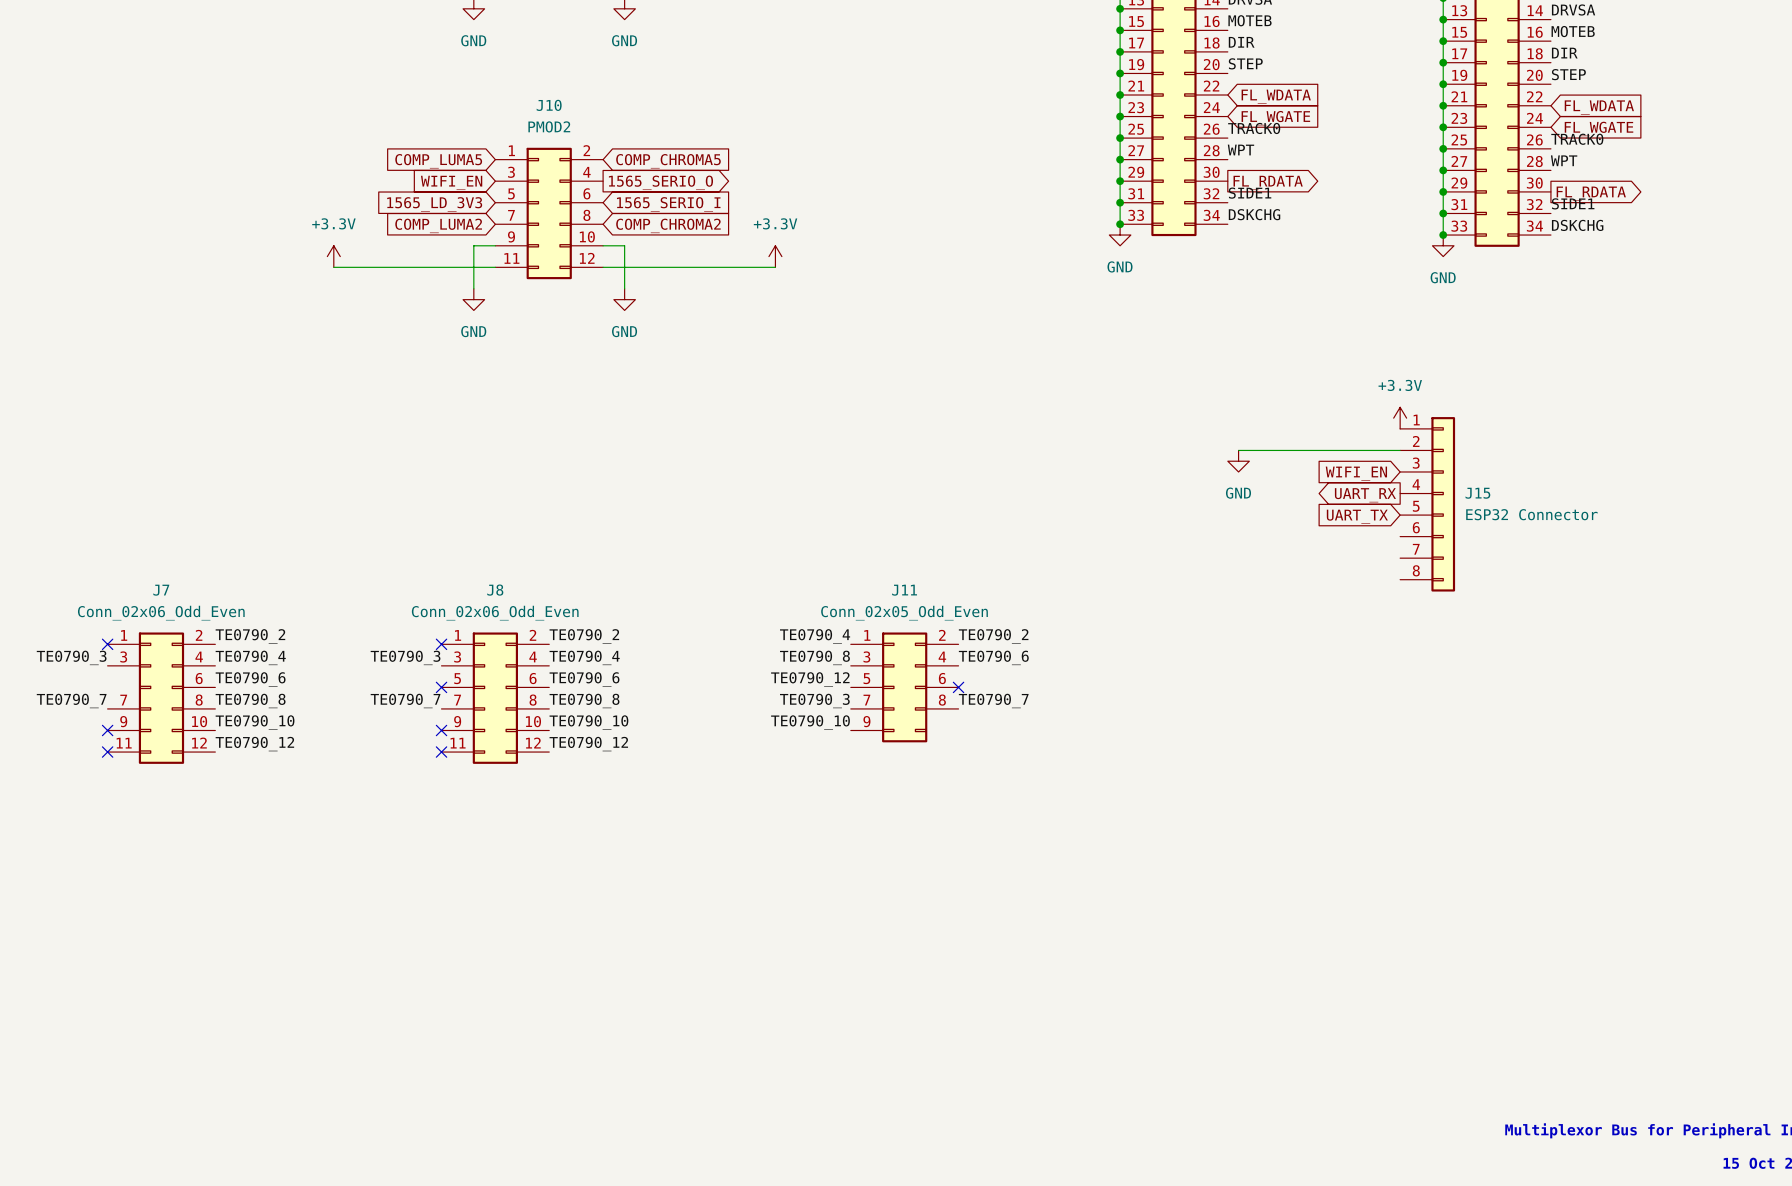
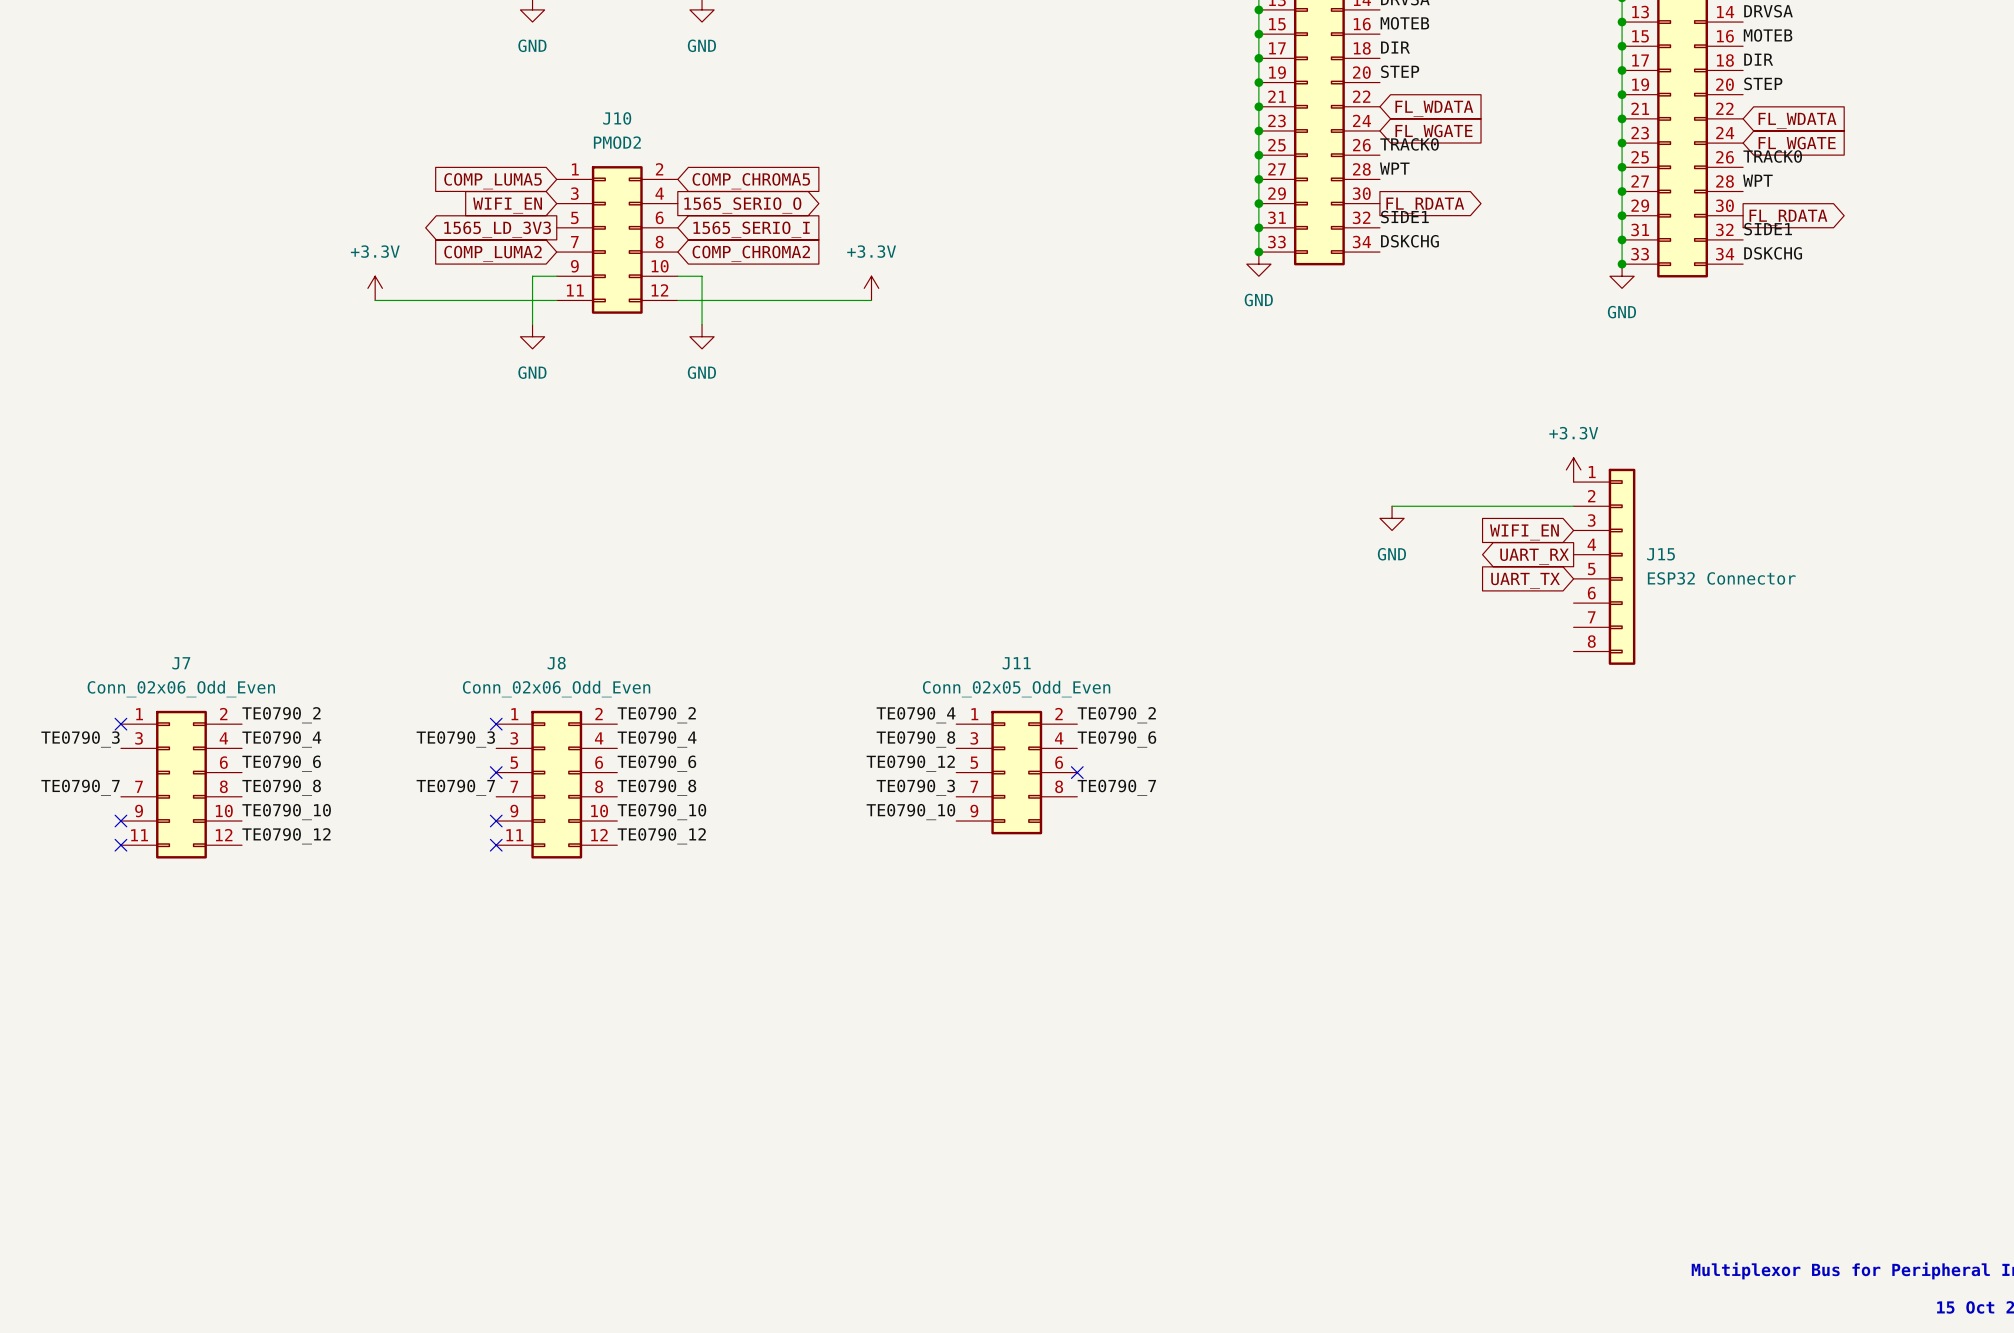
global label shape: input (434, 204) -> output (497, 229)

